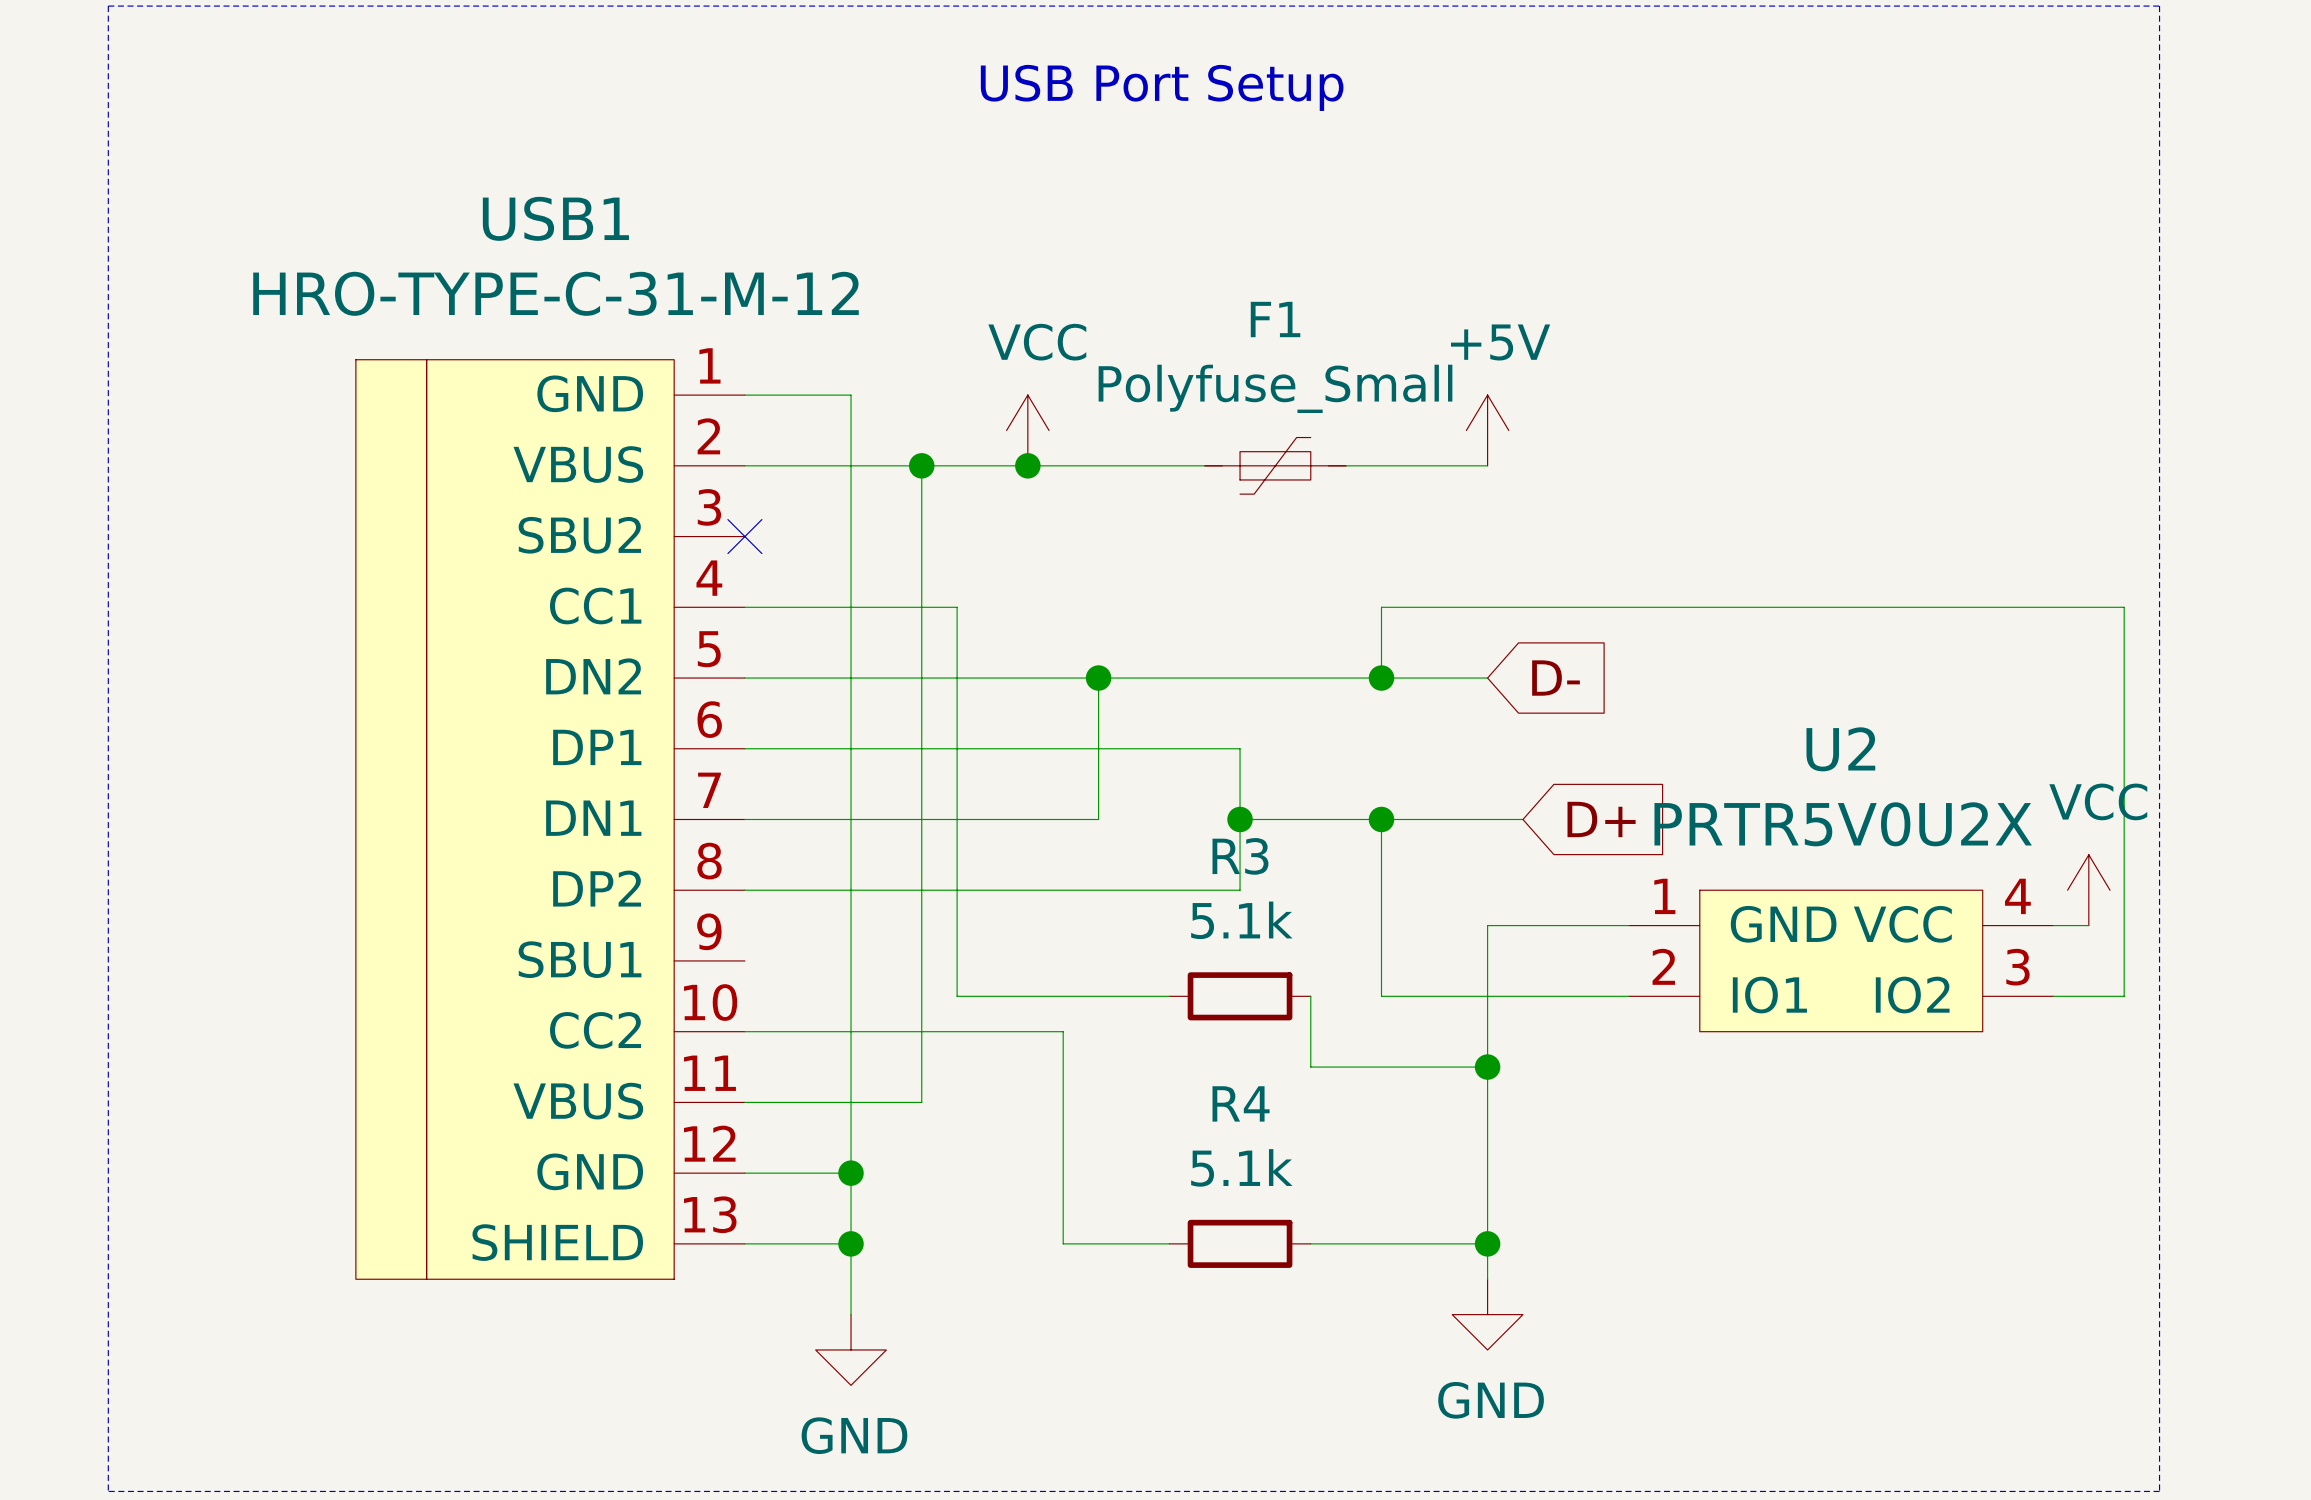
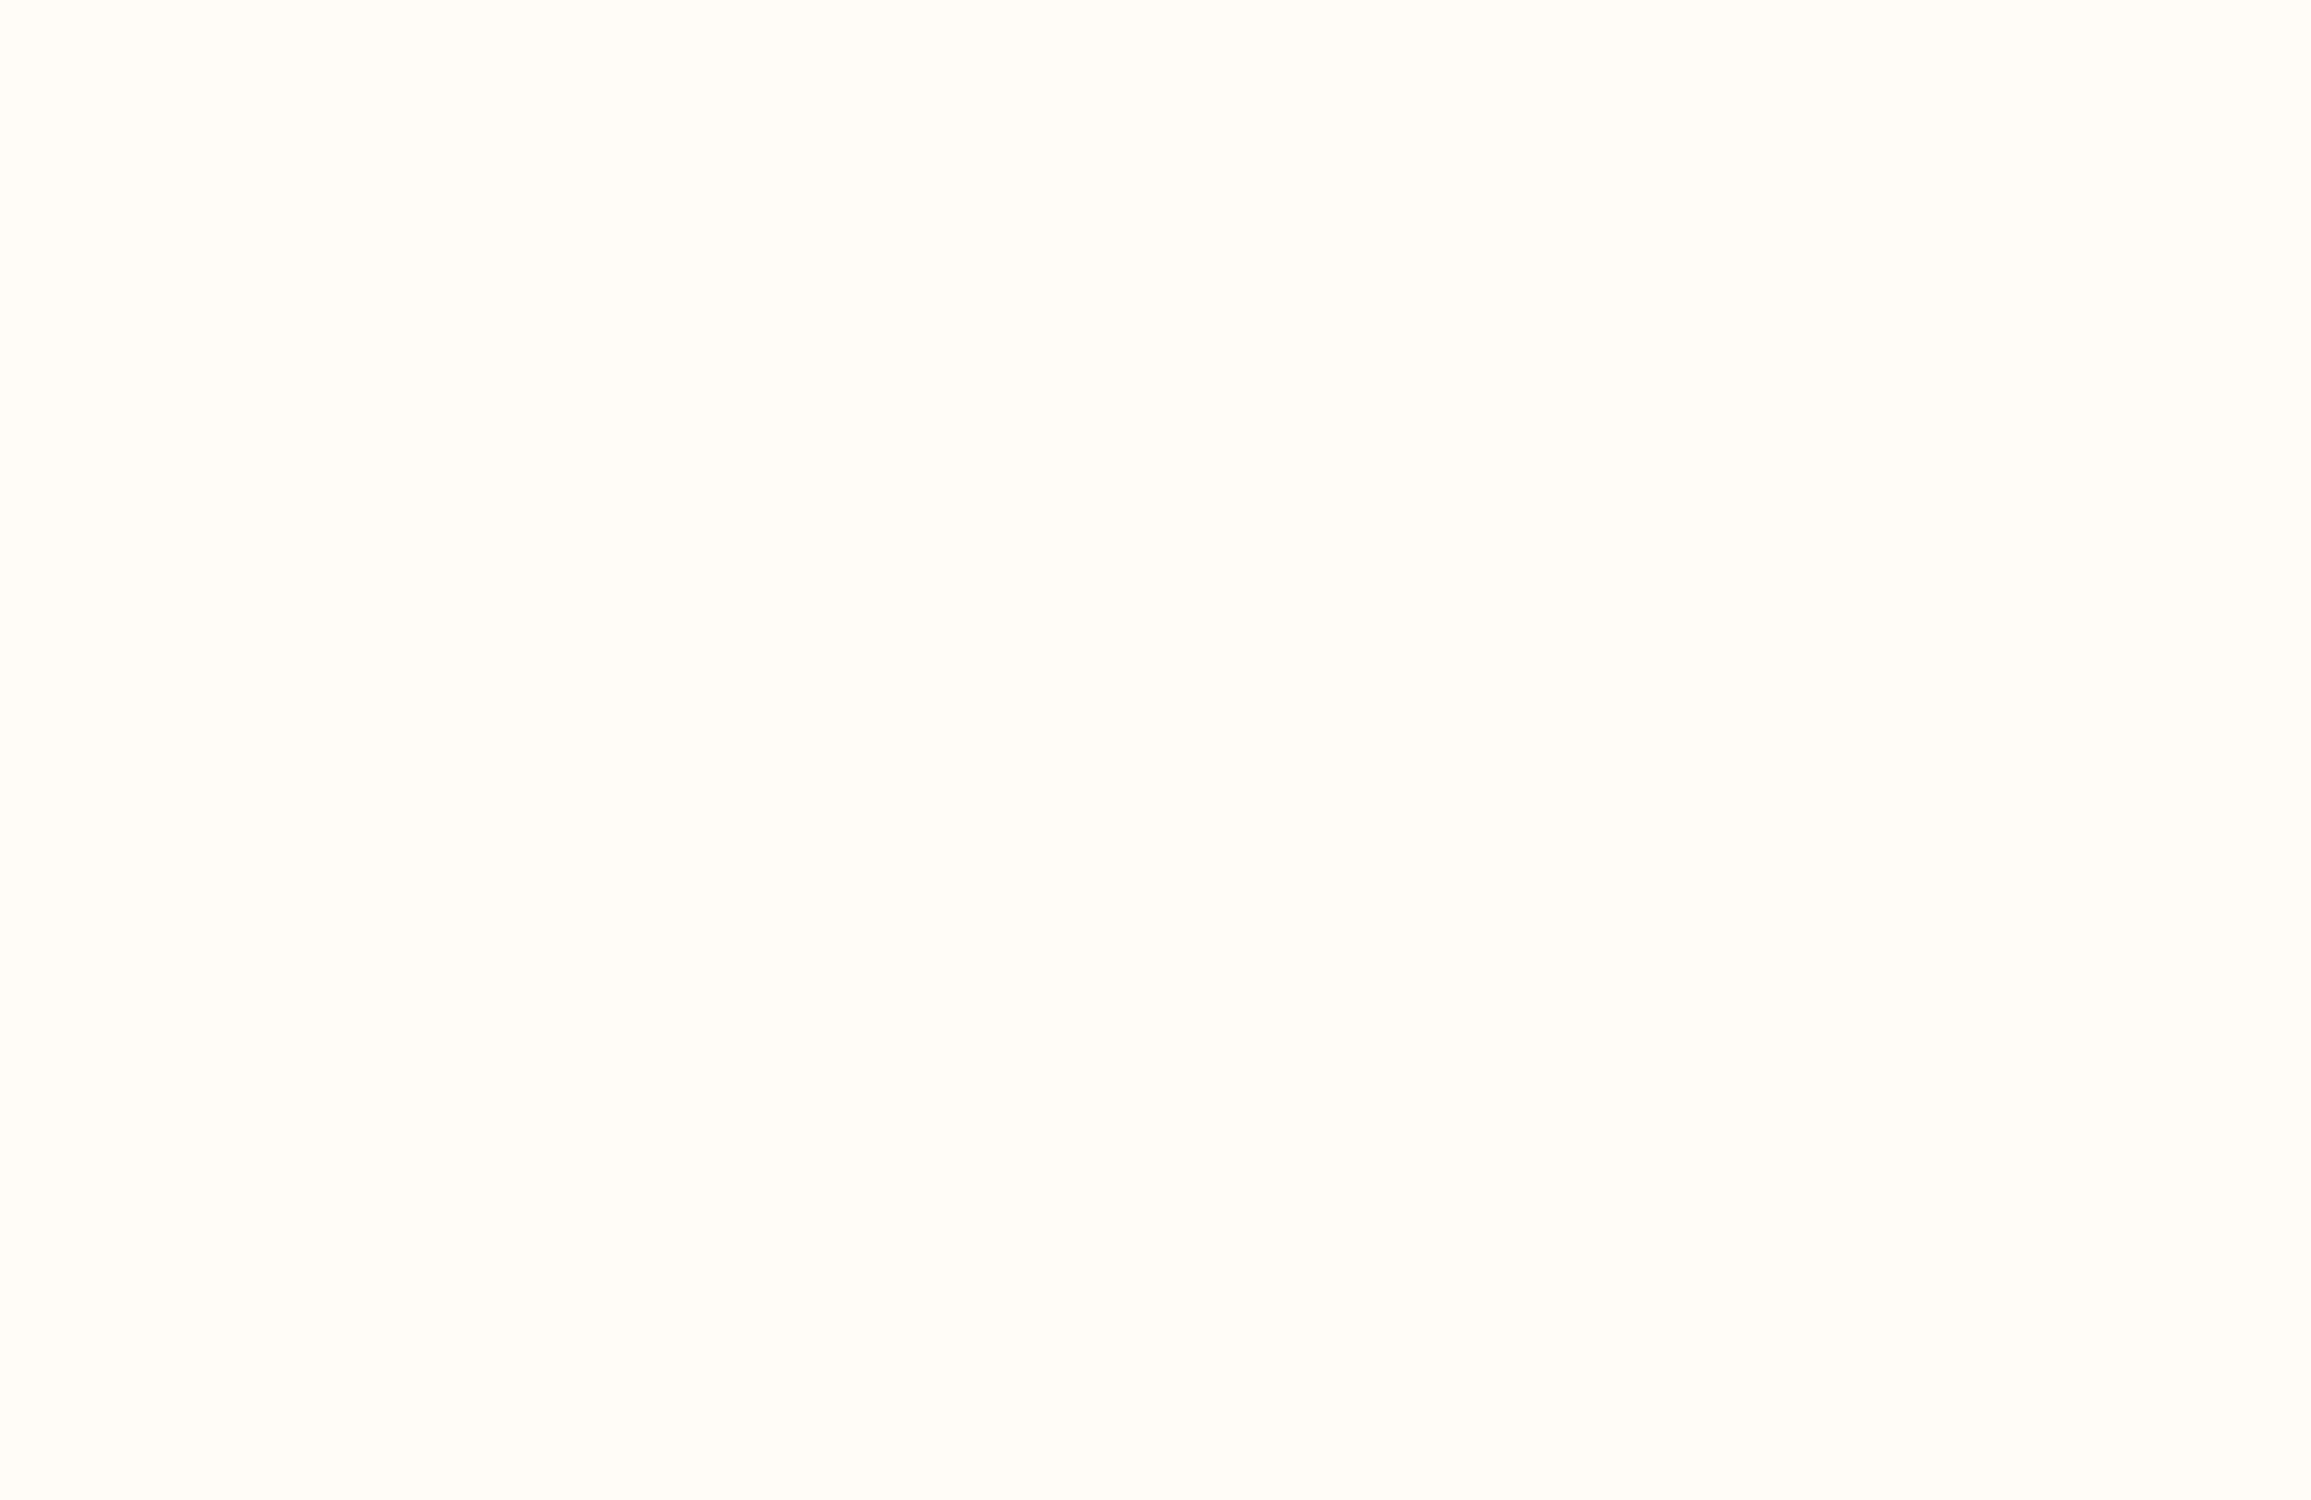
line: (108, 6) (2159, 6) (2159, 1491) (108, 1491) (108, 6) -> none
text: USB Port Setup (1162, 87) -> none
wire: (744, 395) (851, 395) (851, 1314) -> none
power symbol: VCC (1027, 430) -> none
power symbol: +5V (1487, 430) -> none
wire: (744, 465) (1204, 465) -> none
wire: (921, 465) (921, 1102) (744, 1102) -> none
junction: (921, 465) -> none
junction: (1027, 465) -> none
F1: Polyfuse_Small (1275, 465) -> none
wire: (1346, 465) (1487, 465) -> none
no-connect mark: (744, 536) -> none
wire: (744, 607) (957, 607) (957, 996) (1169, 996) -> none
wire: (744, 678) (1487, 678) -> none
wire: (1098, 678) (1098, 819) (744, 819) -> none
junction: (1098, 678) -> none
wire: (1381, 678) (1381, 607) (2124, 607) (2124, 996) (2053, 996) -> none
junction: (1381, 678) -> none
global label: D- (1556, 678) -> none
wire: (744, 748) (1240, 748) (1240, 890) (744, 890) -> none
USB1: HRO-TYPE-C-31-M-12 (550, 819) -> none
wire: (1240, 819) (1522, 819) -> none
junction: (1240, 819) -> none
wire: (1381, 819) (1381, 996) (1629, 996) -> none
junction: (1381, 819) -> none
global label: D+ (1601, 819) -> none
power symbol: VCC (2088, 890) -> none
wire: (1629, 925) (1487, 925) (1487, 1279) -> none
wire: (2053, 925) (2088, 925) -> none
U2: PRTR5V0U2X (1841, 960) -> none
R3: 5.1k (1240, 996) -> none
wire: (1310, 996) (1310, 1067) (1487, 1067) -> none
wire: (744, 1031) (1063, 1031) (1063, 1243) (1169, 1243) -> none
junction: (1487, 1067) -> none
wire: (744, 1173) (851, 1173) -> none
junction: (851, 1173) -> none
wire: (744, 1243) (851, 1243) -> none
junction: (851, 1243) -> none
R4: 5.1k (1240, 1243) -> none
wire: (1310, 1243) (1487, 1243) -> none
junction: (1487, 1243) -> none
power symbol: GND (1487, 1314) -> none
power symbol: GND (851, 1349) -> none

